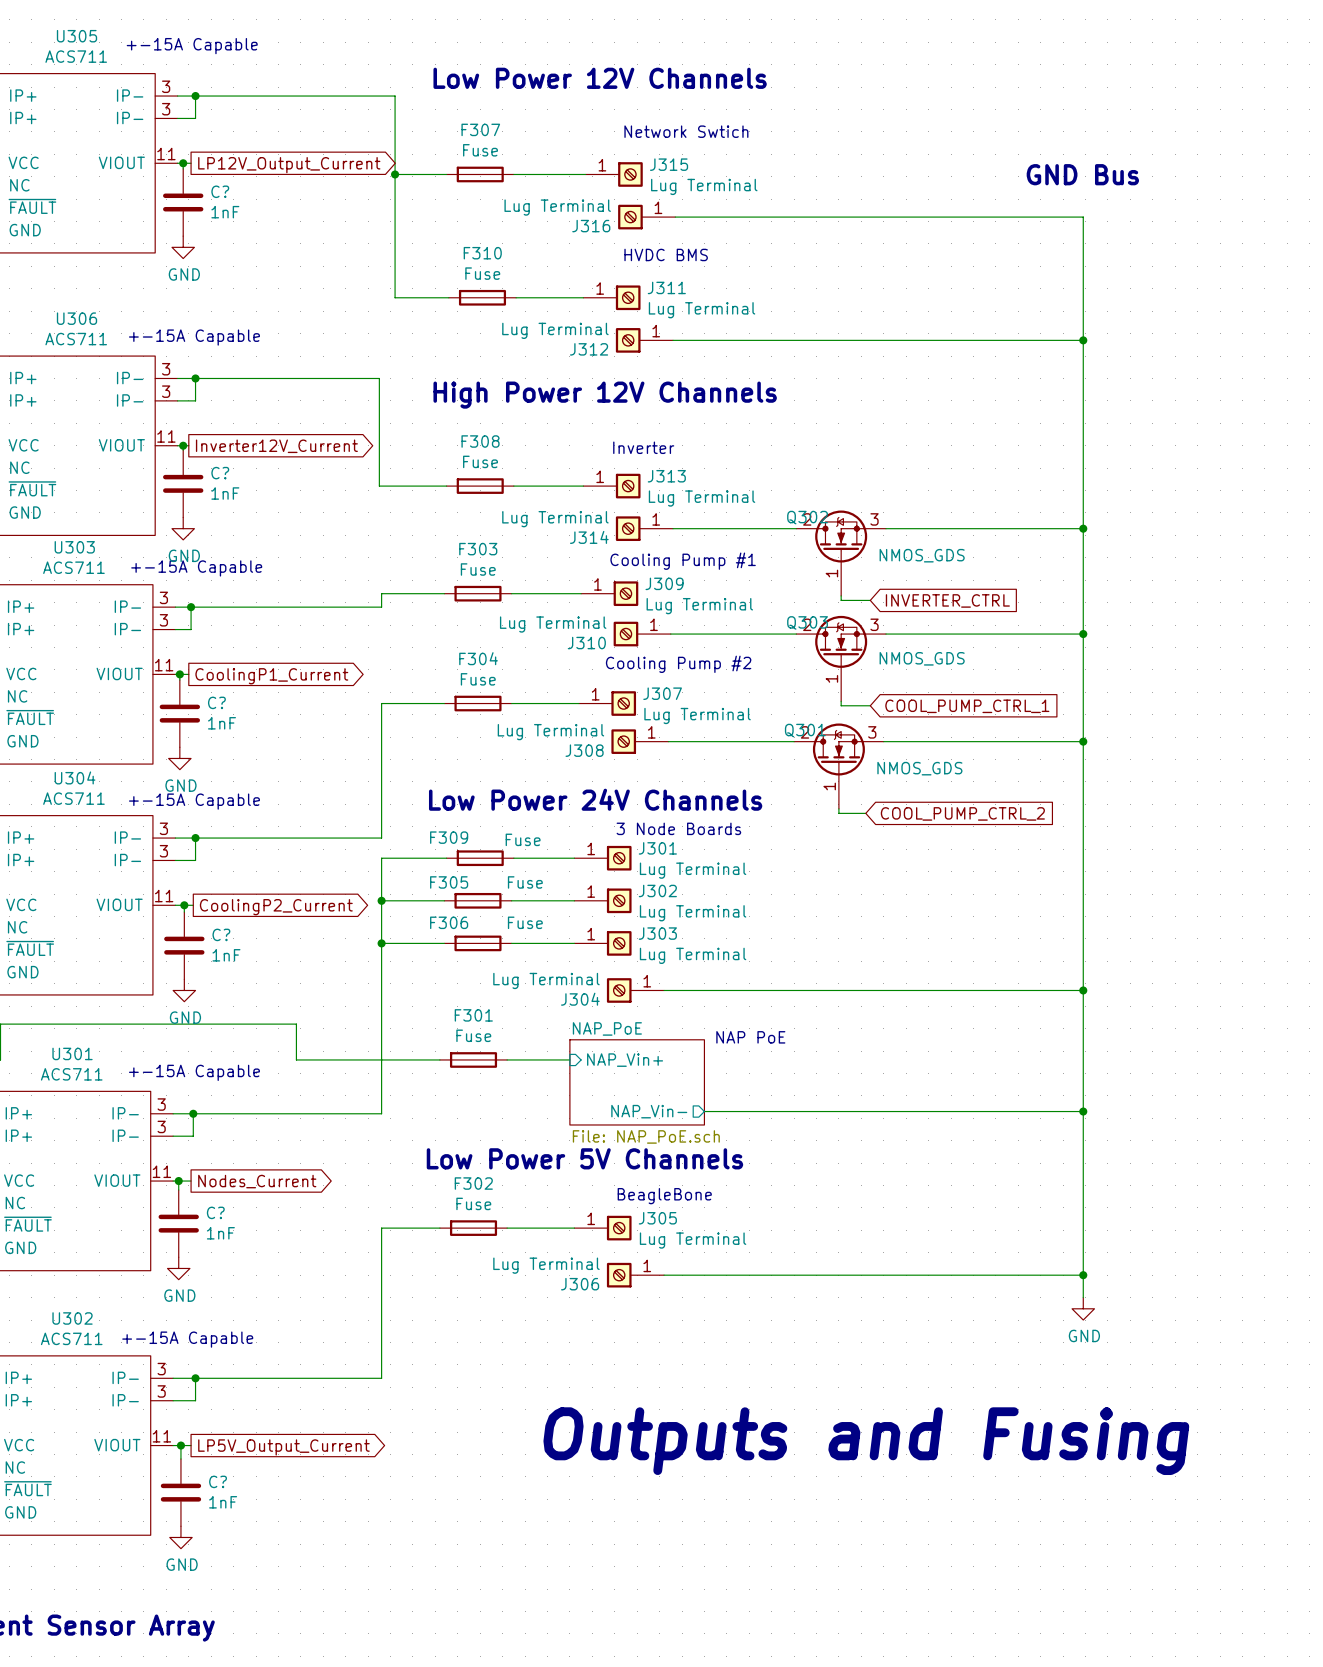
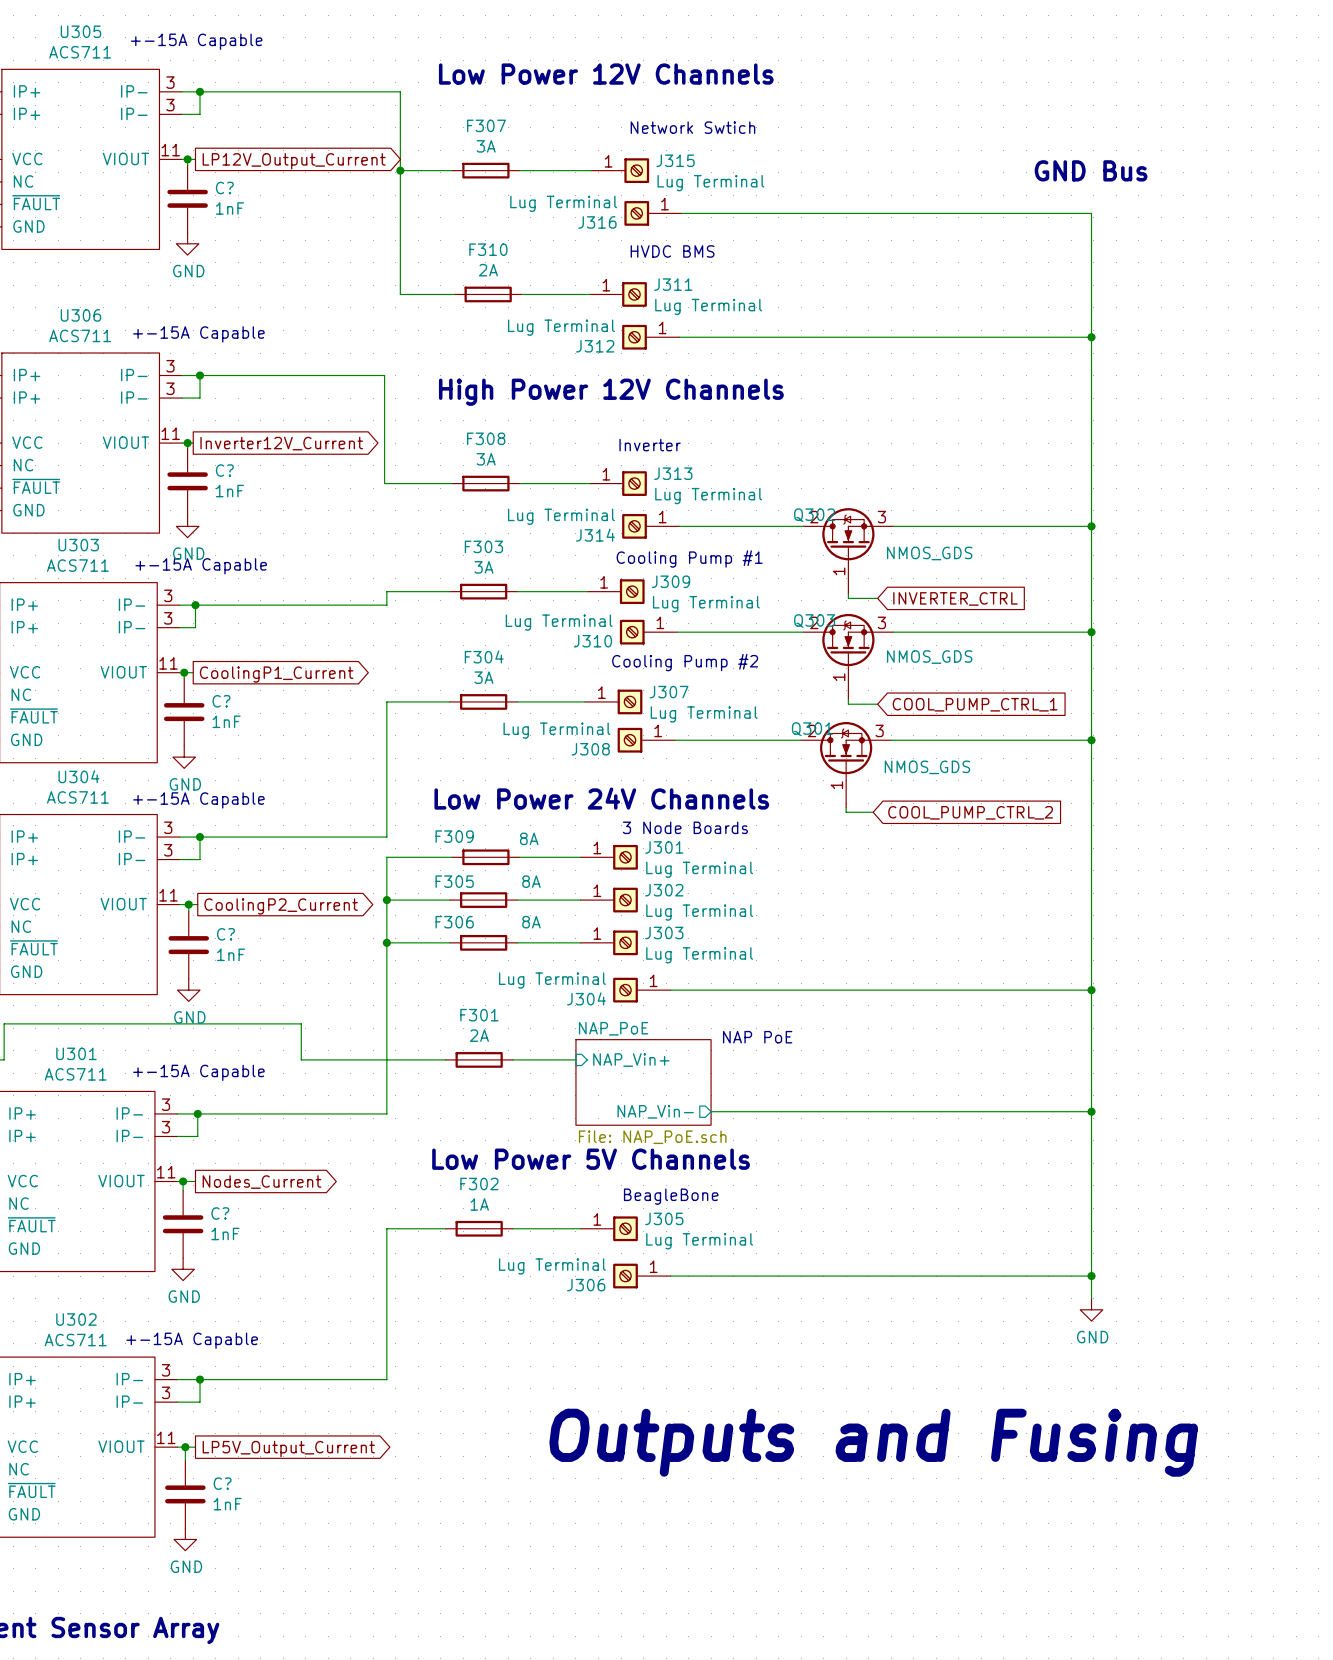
F307 value: Fuse (480, 150) -> 3A (486, 146)
F310 value: Fuse (482, 273) -> 2A (488, 270)
F308 value: Fuse (480, 461) -> 3A (486, 459)
F303 value: Fuse (478, 569) -> 3A (483, 567)
F304 value: Fuse (478, 679) -> 3A (483, 677)
F309 value: Fuse (523, 839) -> 8A (529, 838)
F305 value: Fuse (525, 882) -> 8A (531, 881)
F306 value: Fuse (525, 922) -> 8A (531, 922)
F301 value: Fuse (473, 1035) -> 2A (479, 1035)
F302 value: Fuse (473, 1203) -> 1A (479, 1204)

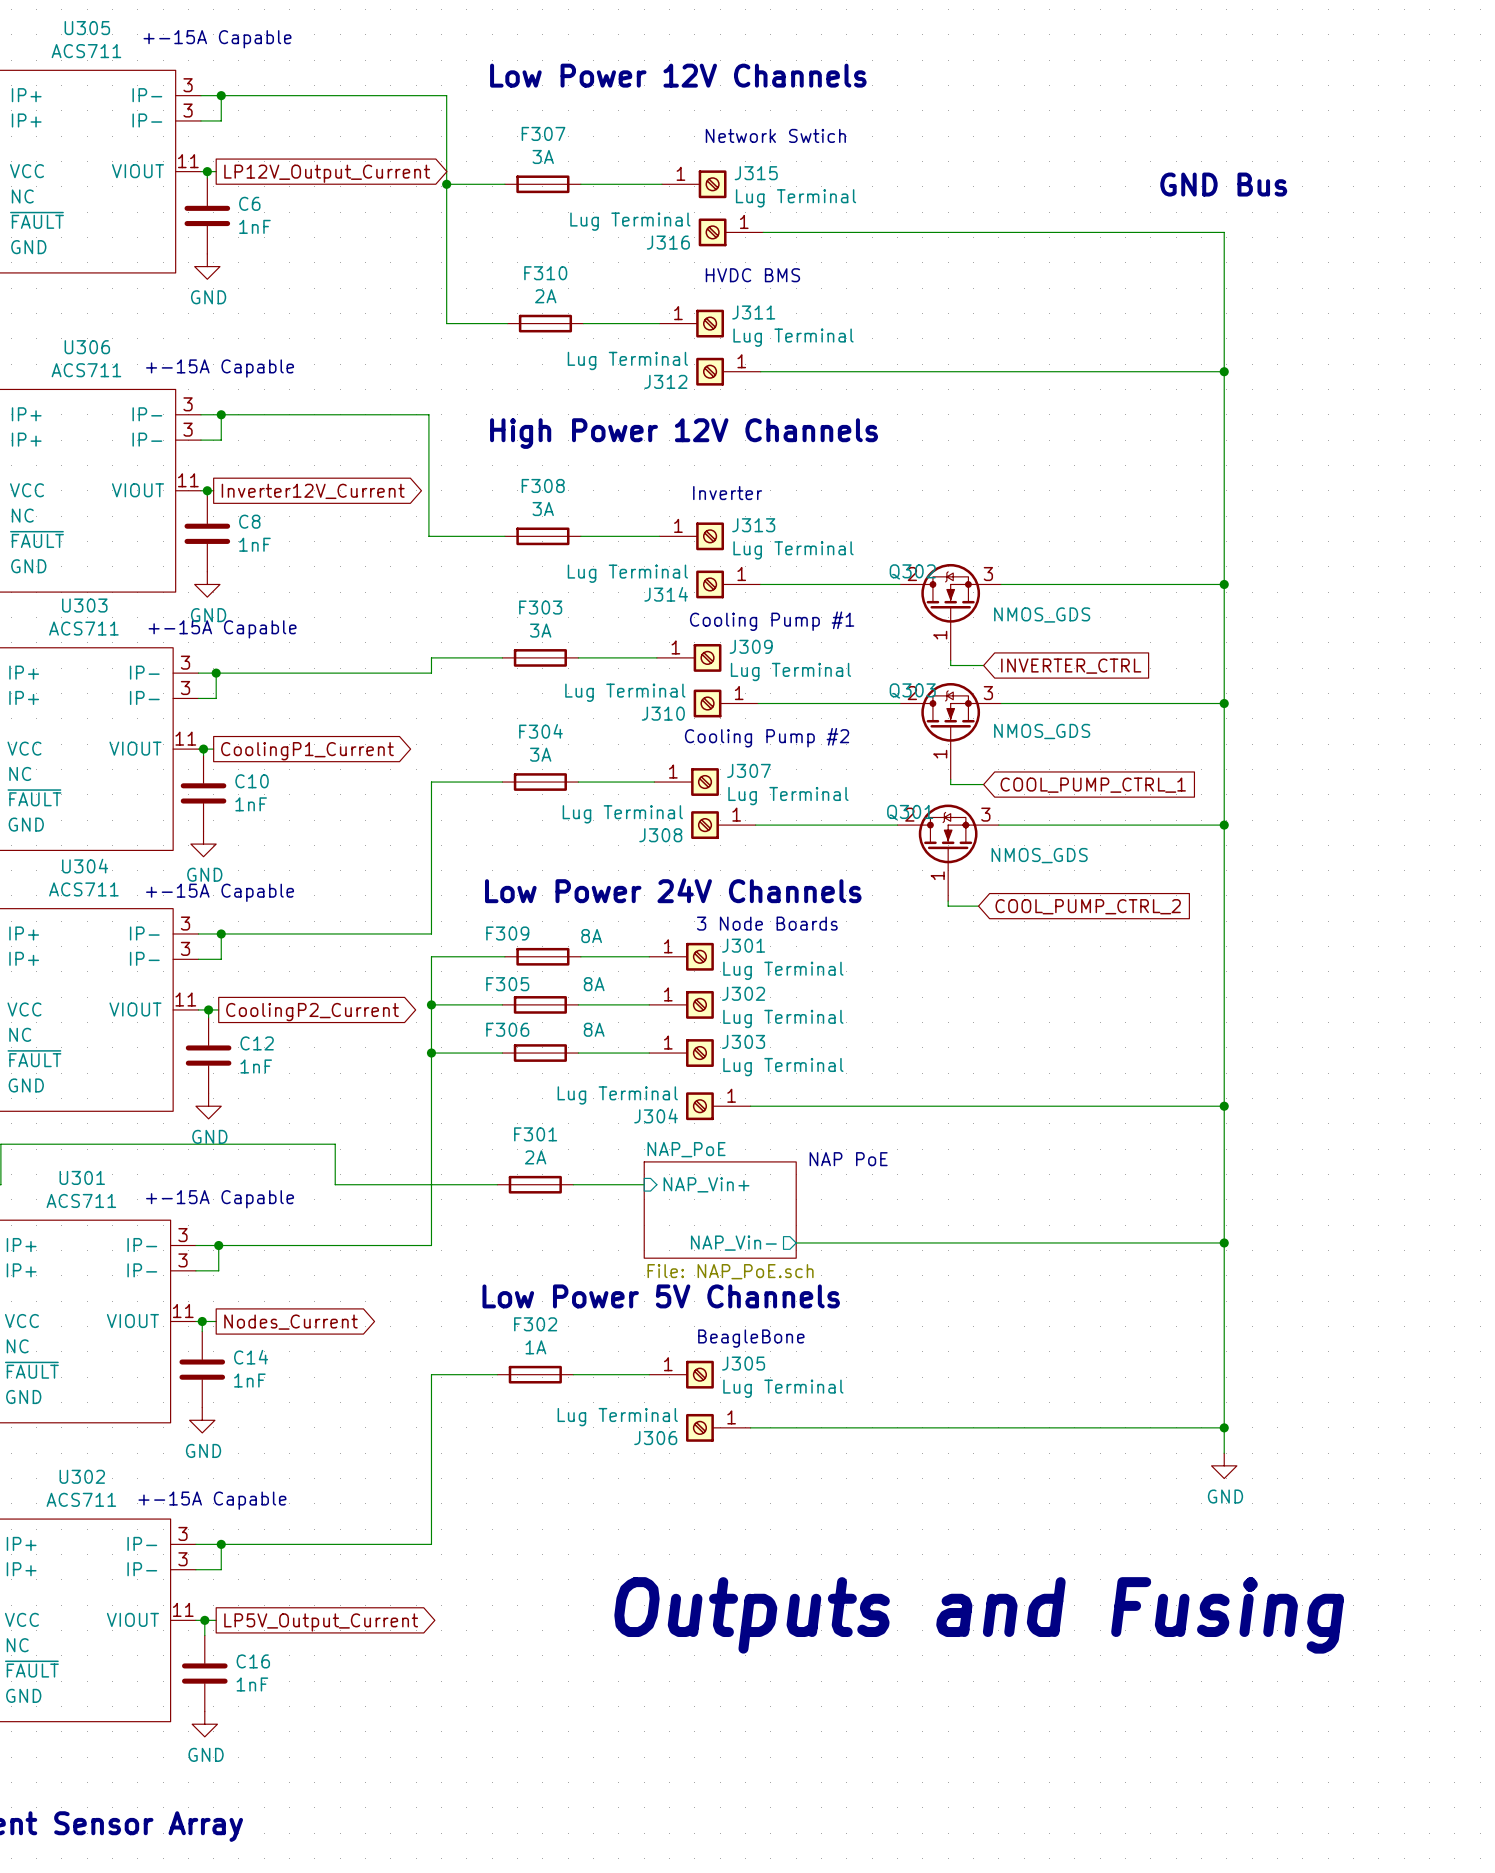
C? name: C? (224, 188) -> C6 (249, 203)
C? name: C? (224, 470) -> C8 (249, 521)
C? name: C? (221, 701) -> C10 (252, 781)
C? name: C? (225, 934) -> C12 (257, 1043)
C? name: C? (220, 1213) -> C14 (251, 1357)
C? name: C? (222, 1483) -> C16 (253, 1661)

